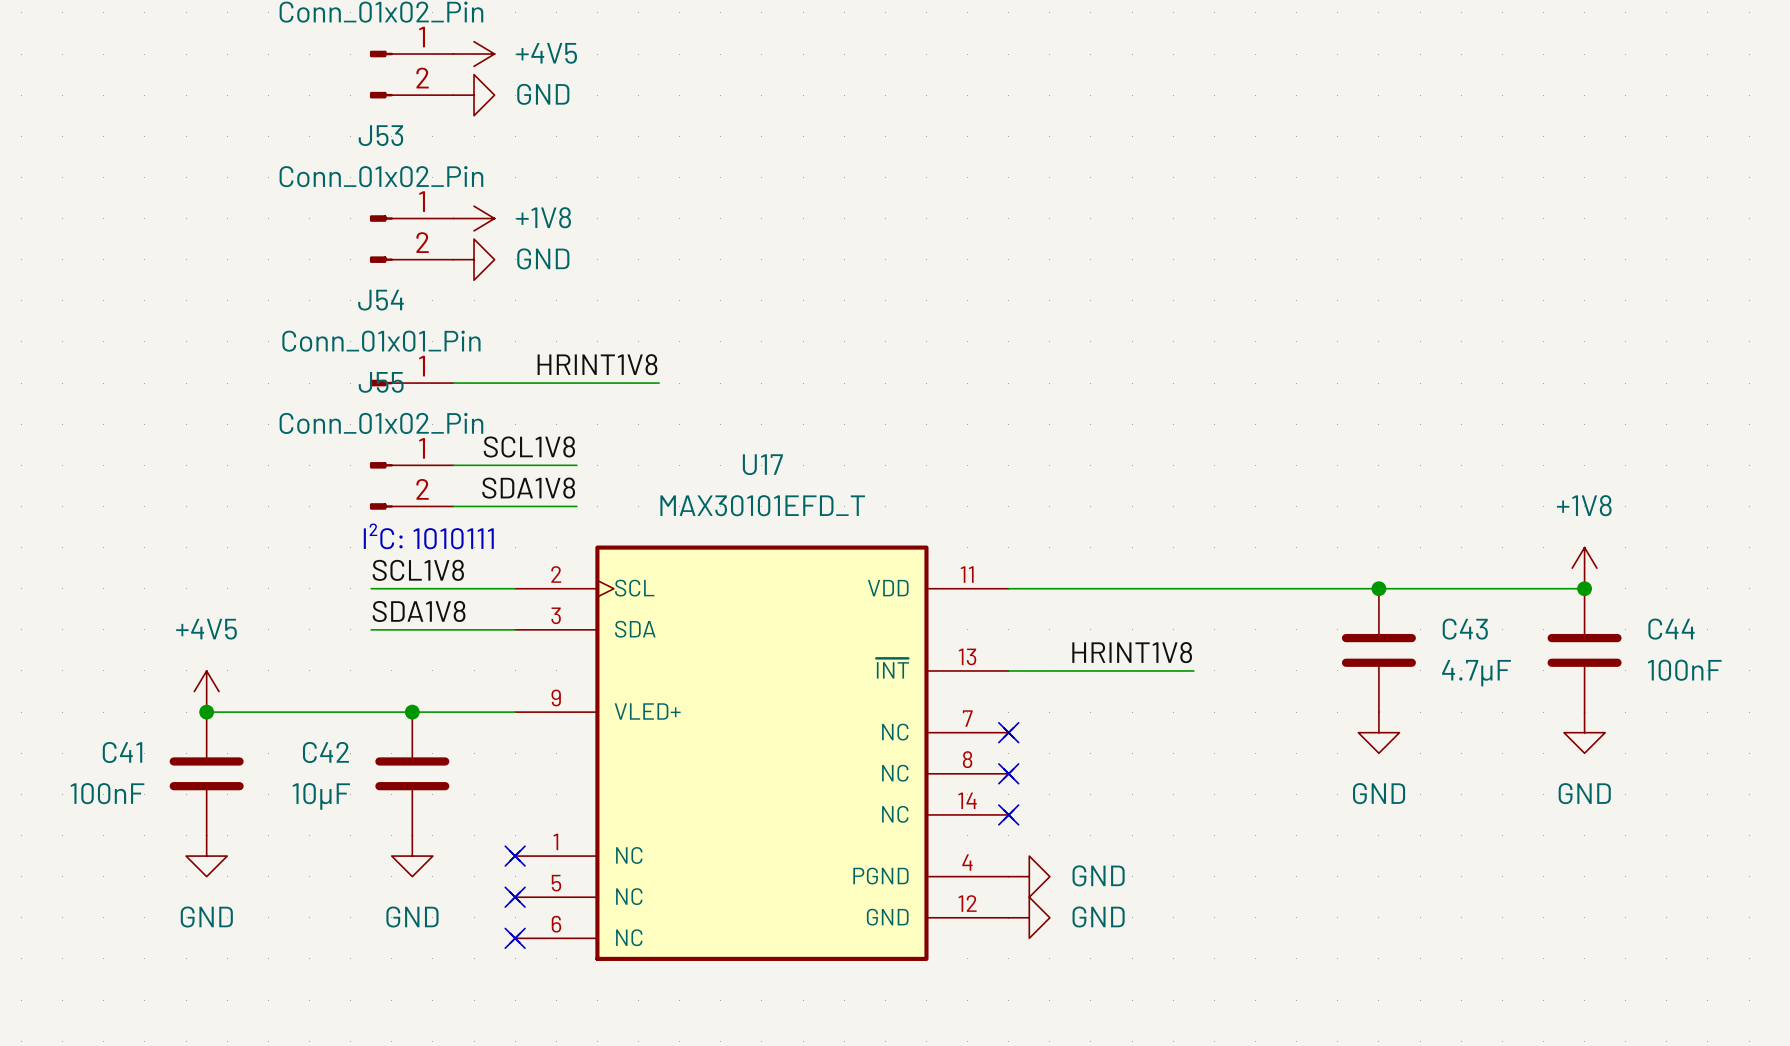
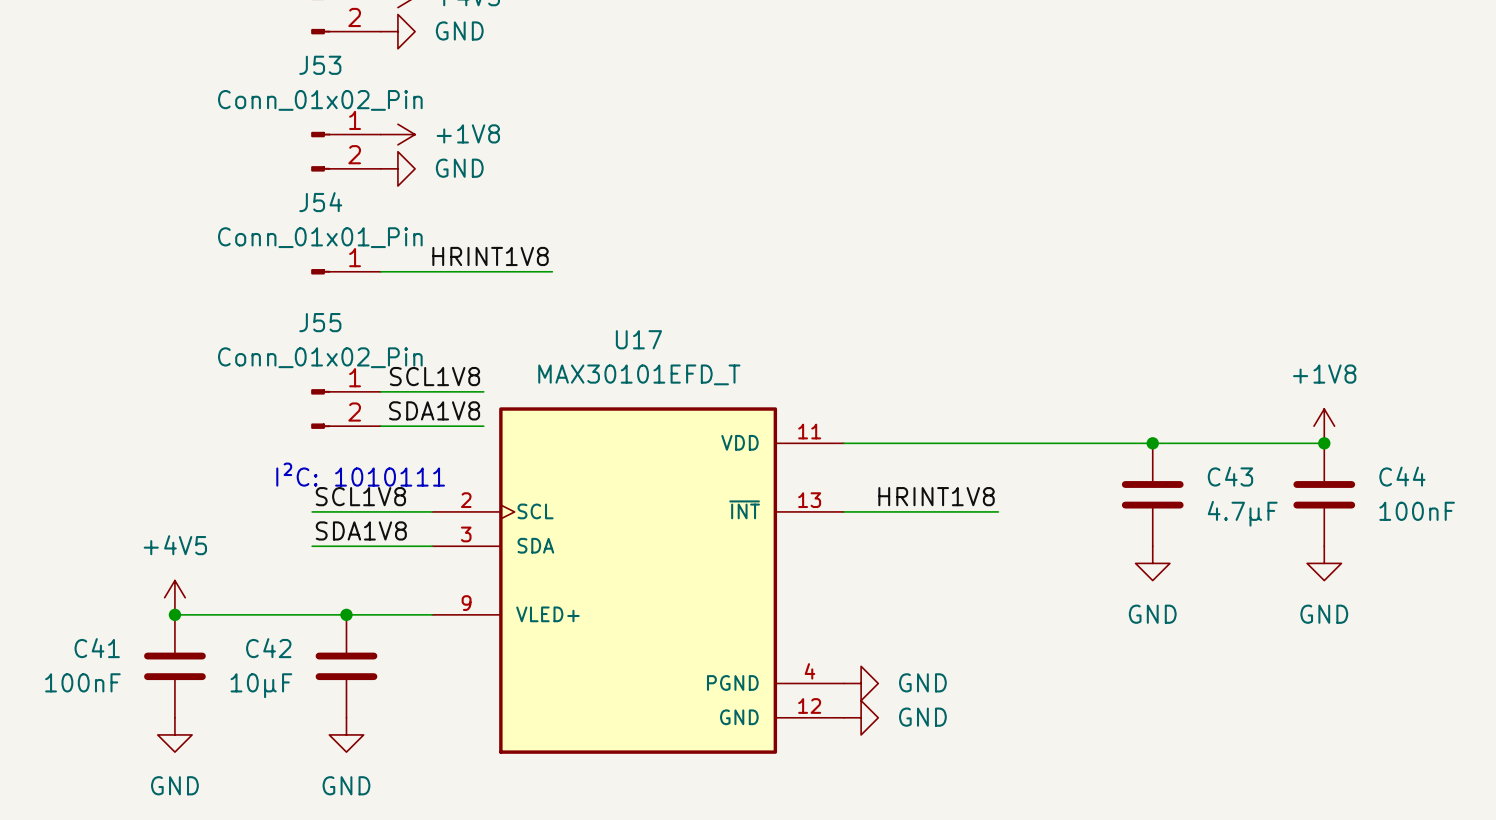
label position: SCL1V8 (529, 446) -> SCL1V8 (434, 376)
wire: (453, 465) (576, 465) -> (380, 391) (483, 391)
J55 position: (411, 485) -> (345, 409)
label position: SDA1V8 (528, 488) -> SDA1V8 (434, 410)
wire: (453, 506) (576, 506) -> (380, 426) (483, 426)
text position: I²C: 1010111 (428, 536) -> I²C: 1010111 (360, 474)
U17 symbol: [510, 545, 1014, 961] -> [432, 407, 844, 754]
label position: SCL1V8 (418, 570) -> SCL1V8 (360, 496)
wire: (371, 588) (515, 588) -> none
label position: SDA1V8 (419, 611) -> SDA1V8 (361, 530)
wire: (371, 629) (515, 629) -> (312, 511) (432, 511)
power symbol position: +4V5 (206, 691) -> +4V5 (174, 597)
wire: (206, 712) (371, 712) -> none
junction position: (206, 712) -> (174, 614)
junction position: (412, 712) -> (346, 614)
no-connect mark: (1008, 732) -> none
C41 position: (206, 773) -> (174, 666)
C42 position: (412, 773) -> (346, 666)
no-connect mark: (1008, 773) -> none
wire: none -> (174, 614) (432, 614)
no-connect mark: (1008, 814) -> none
power symbol position: GND (206, 856) -> GND (174, 734)
power symbol position: GND (412, 856) -> GND (346, 734)
no-connect mark: (515, 856) -> none
no-connect mark: (515, 897) -> none
no-connect mark: (515, 938) -> none

